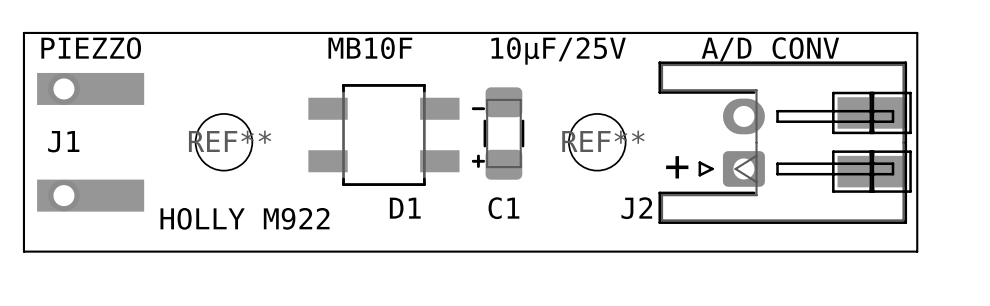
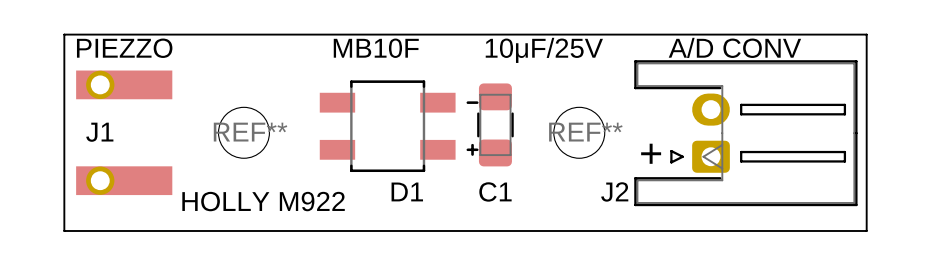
part: (853, 112) -> none
part: (890, 112) -> none
part: (853, 171) -> none
part: (890, 171) -> none

